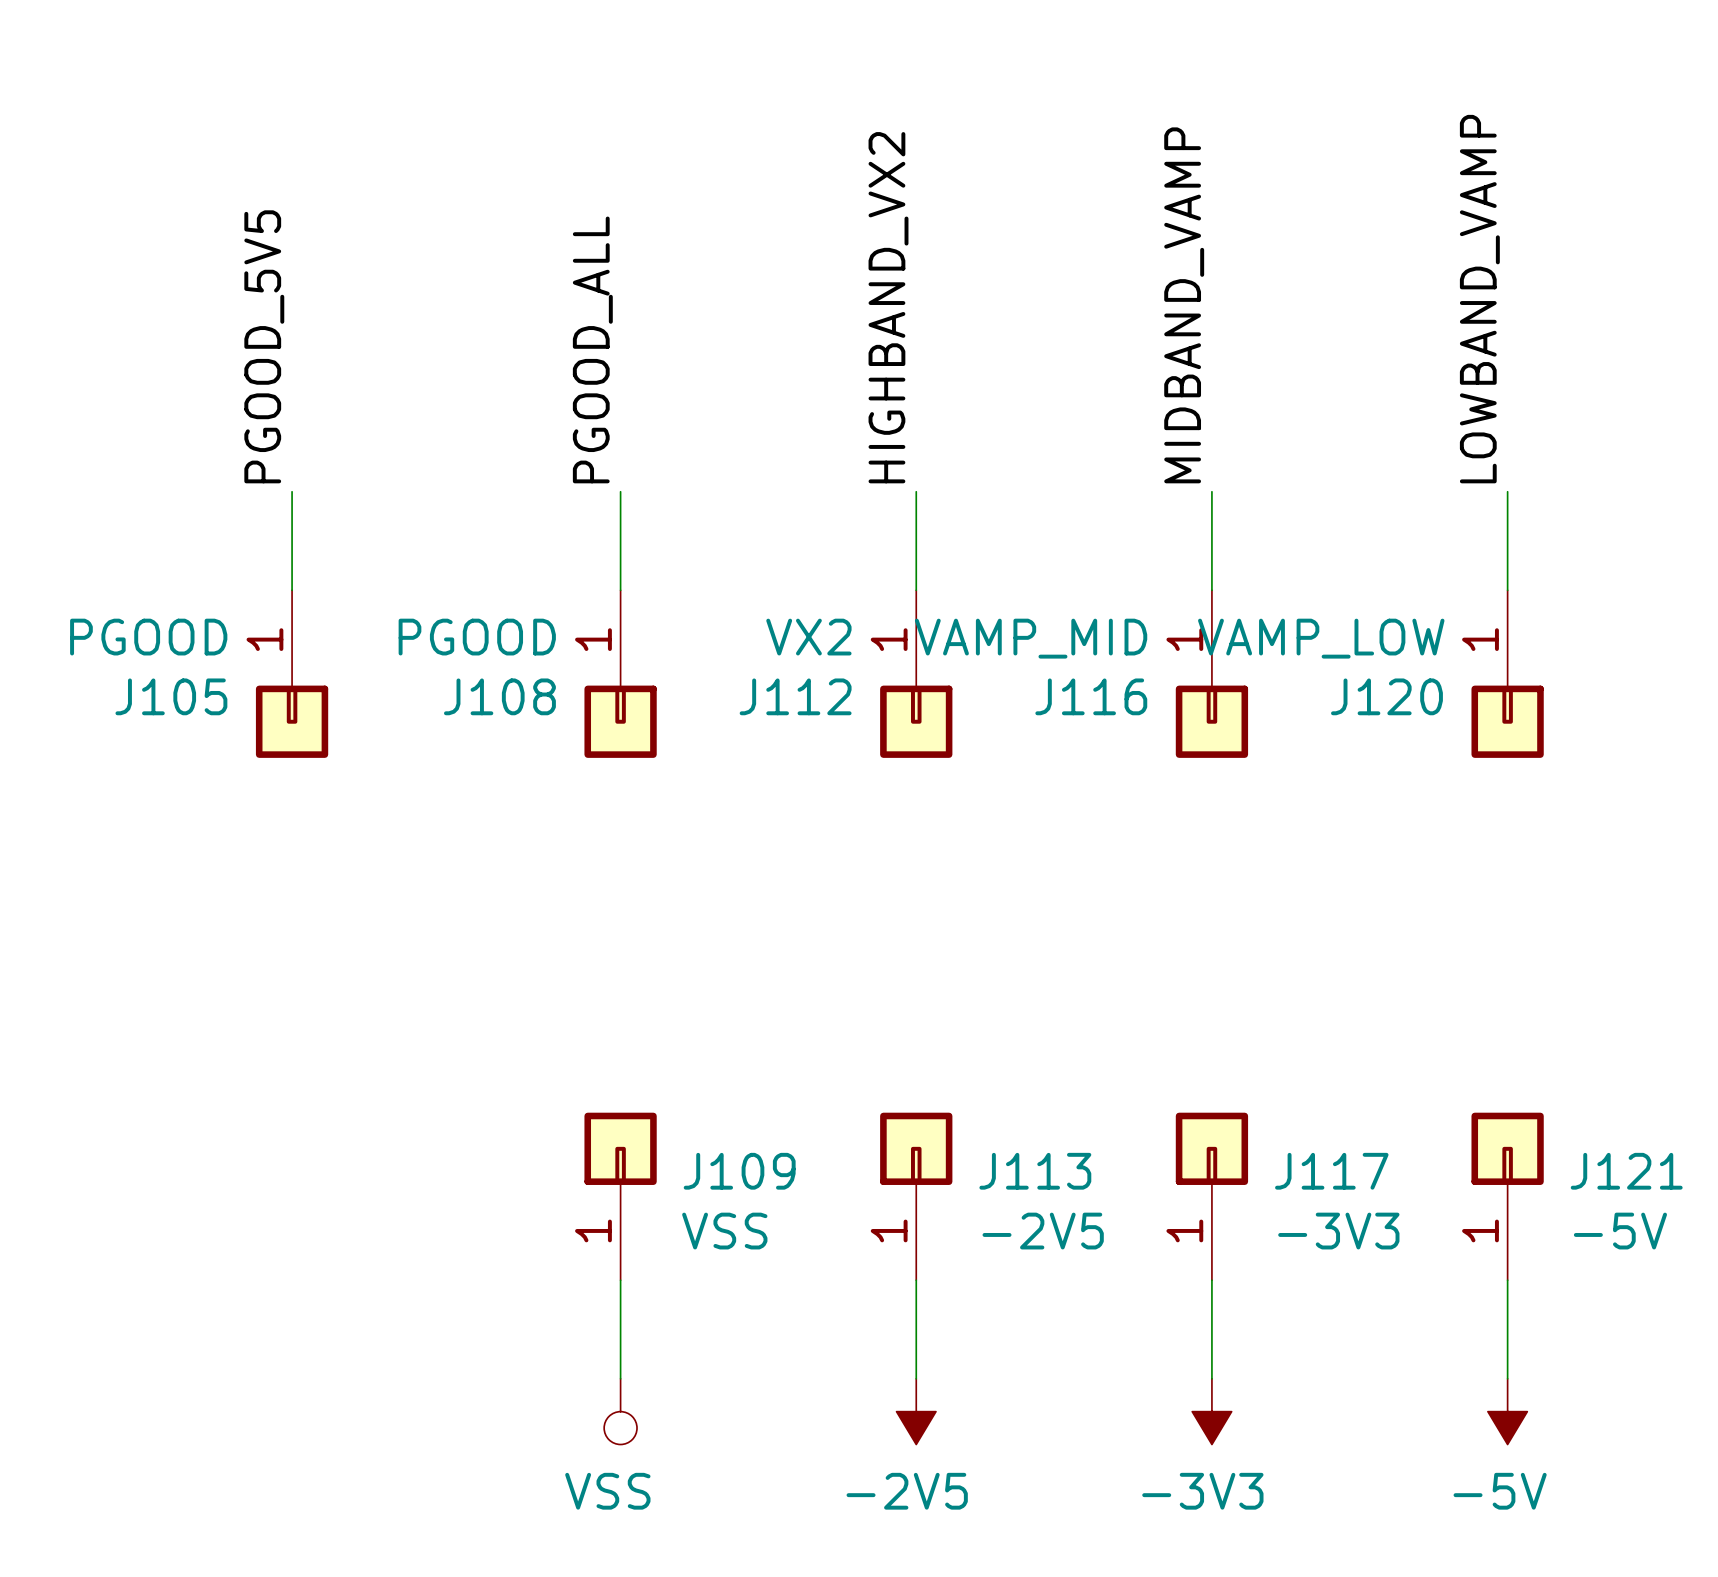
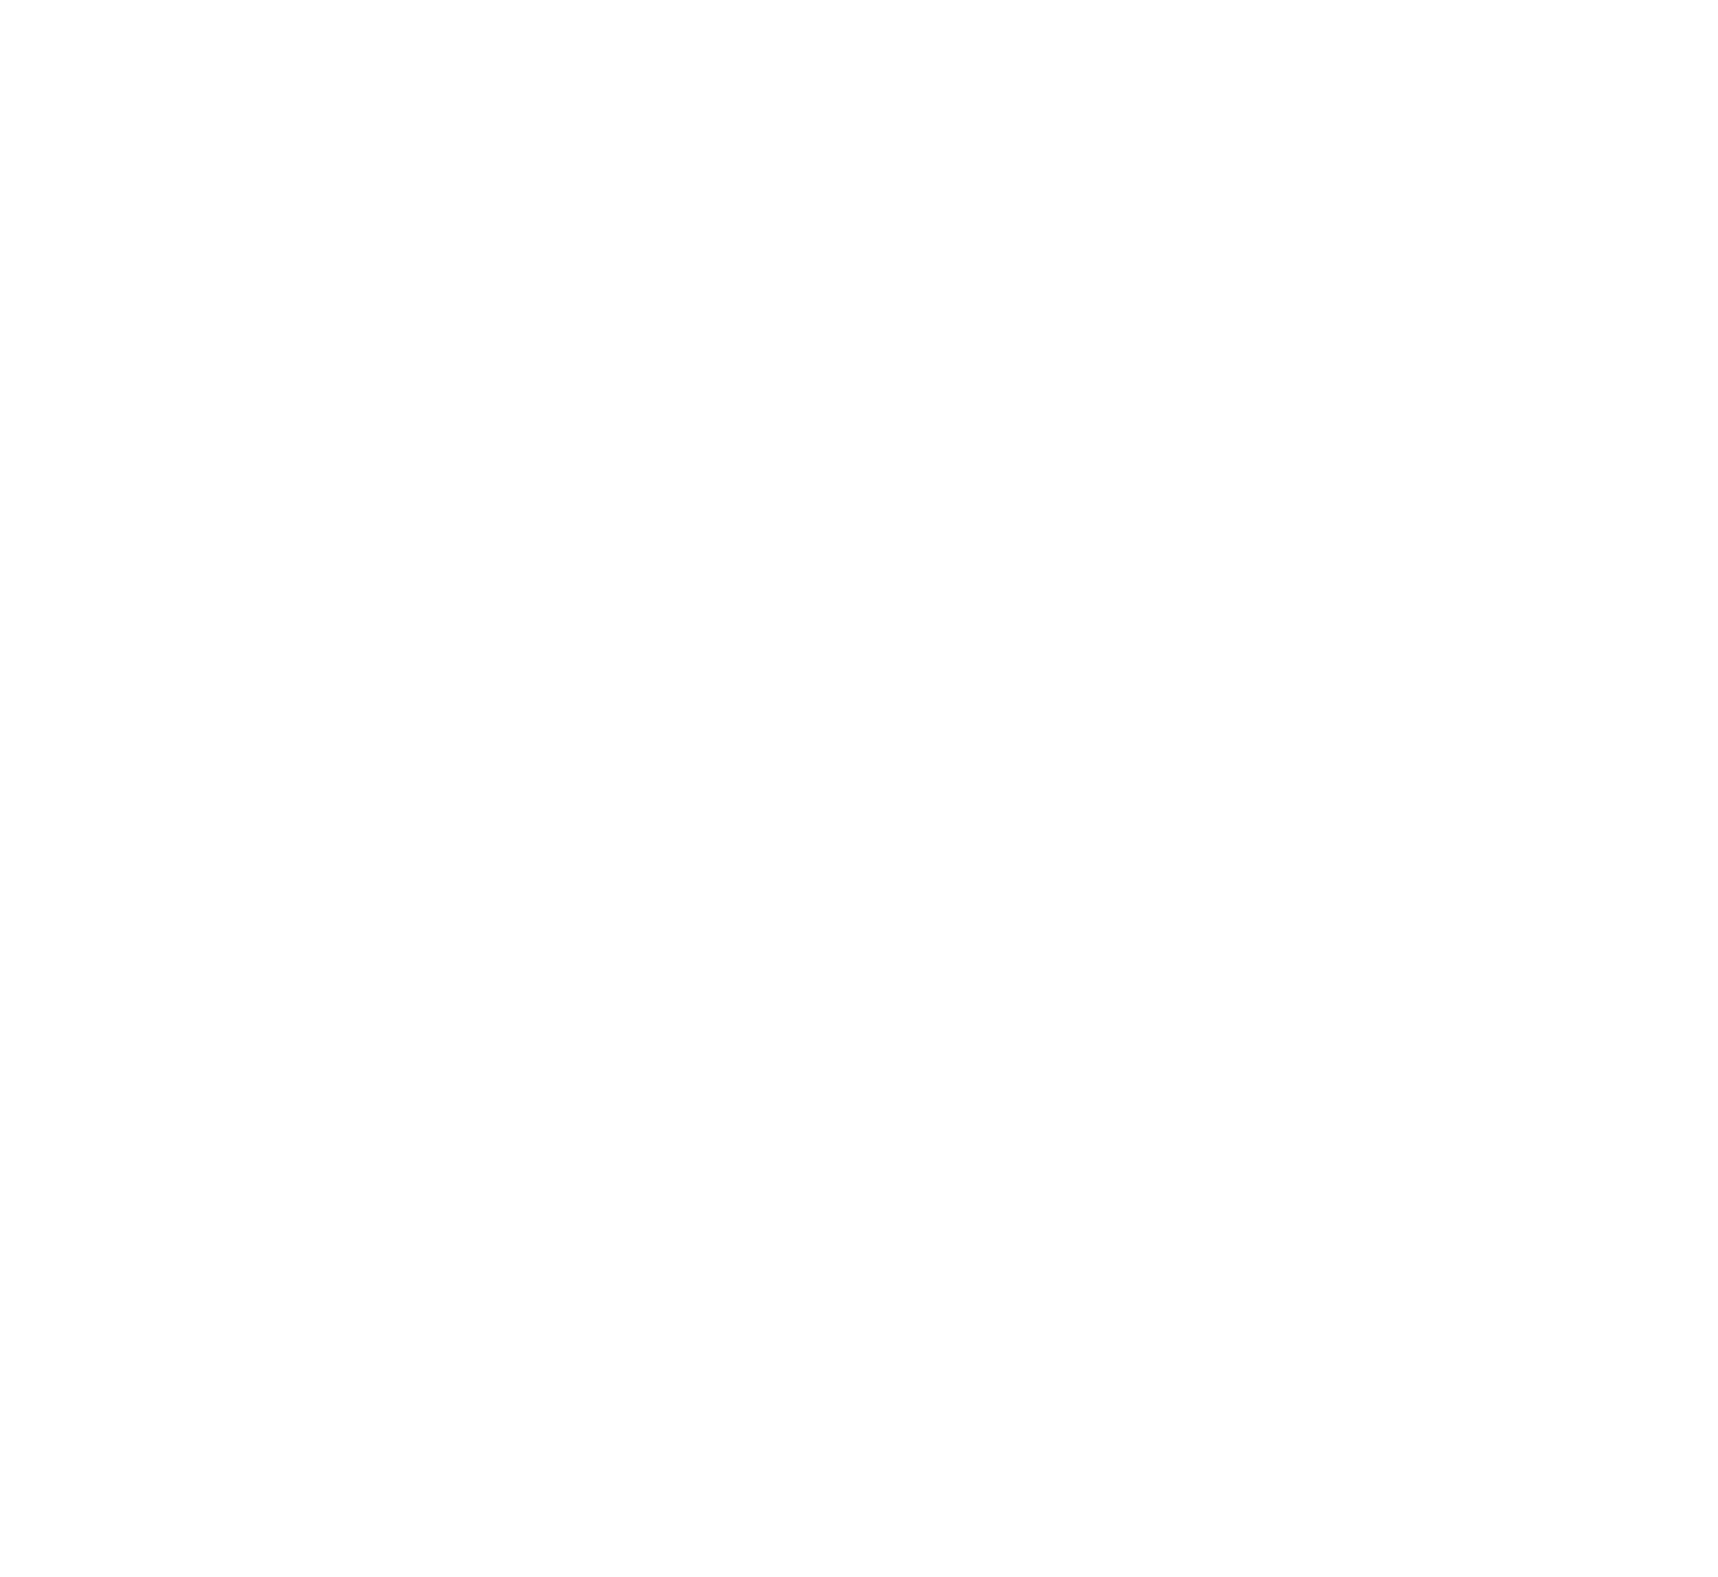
label: LOWBAND_VAMP (1479, 299) -> none
label: MIDBAND_VAMP (1184, 305) -> none
label: HIGHBAND_VX2 (888, 307) -> none
label: PGOOD_5V5 (264, 346) -> none
label: PGOOD_ALL (592, 349) -> none
wire: (292, 491) (292, 590) -> none
wire: (620, 491) (620, 590) -> none
wire: (916, 491) (916, 590) -> none
wire: (1211, 491) (1211, 590) -> none
wire: (1507, 491) (1507, 590) -> none
J105: PGOOD (292, 674) -> none
J108: PGOOD (620, 674) -> none
J112: VX2 (916, 674) -> none
J116: VAMP_MID (1211, 674) -> none
J120: VAMP_LOW (1507, 674) -> none
J109: VSS (620, 1196) -> none
J113: -2V5 (916, 1196) -> none
J117: -3V3 (1211, 1196) -> none
J121: -5V (1507, 1196) -> none
wire: (620, 1280) (620, 1378) -> none
wire: (916, 1280) (916, 1378) -> none
wire: (1211, 1280) (1211, 1378) -> none
wire: (1507, 1280) (1507, 1378) -> none
power symbol: VSS (620, 1411) -> none
power symbol: -2V5 (916, 1411) -> none
power symbol: -3V3 (1211, 1411) -> none
power symbol: -5V (1507, 1411) -> none

